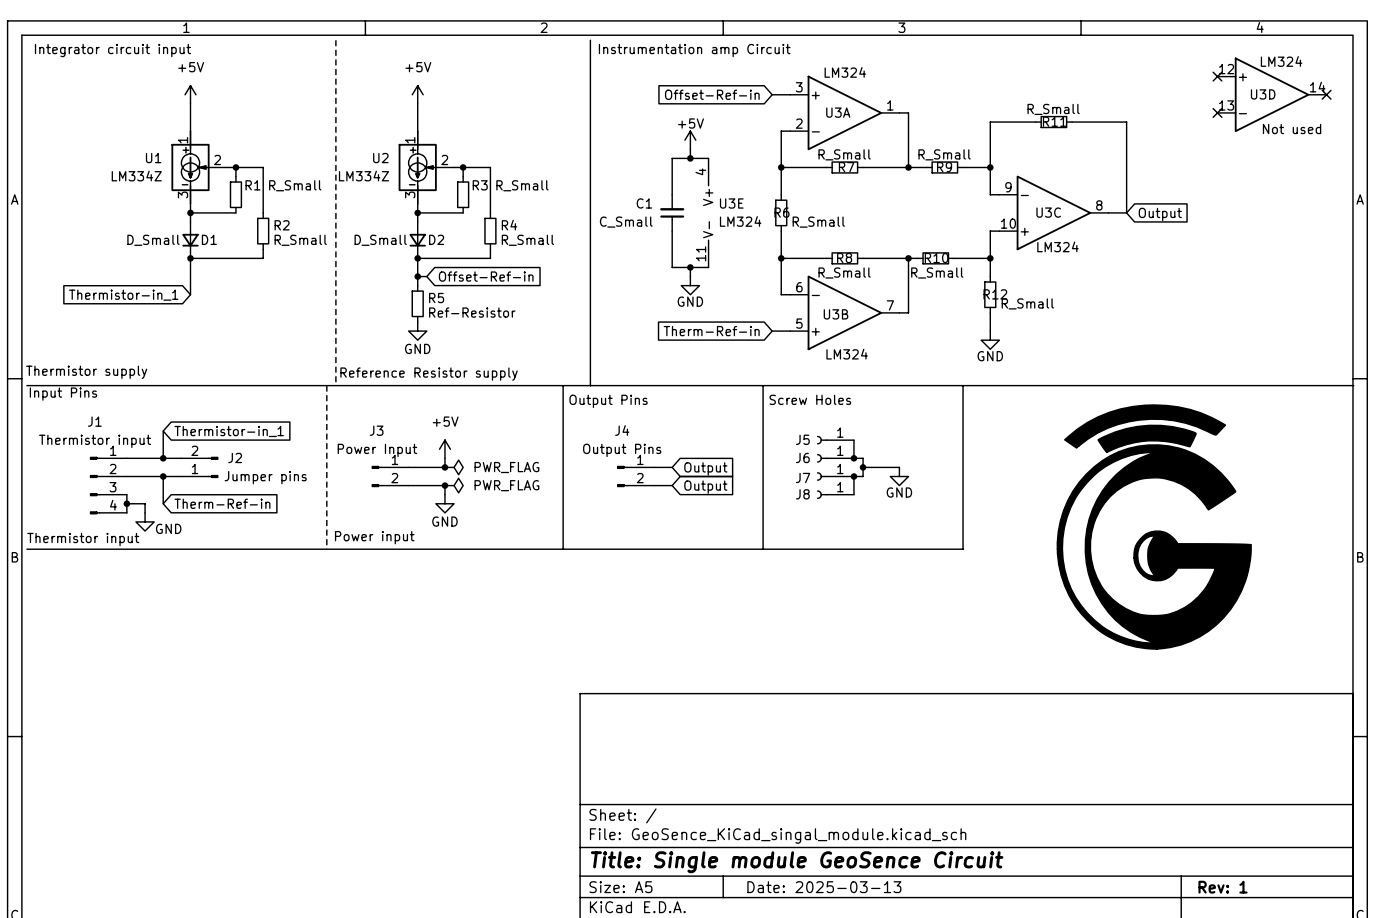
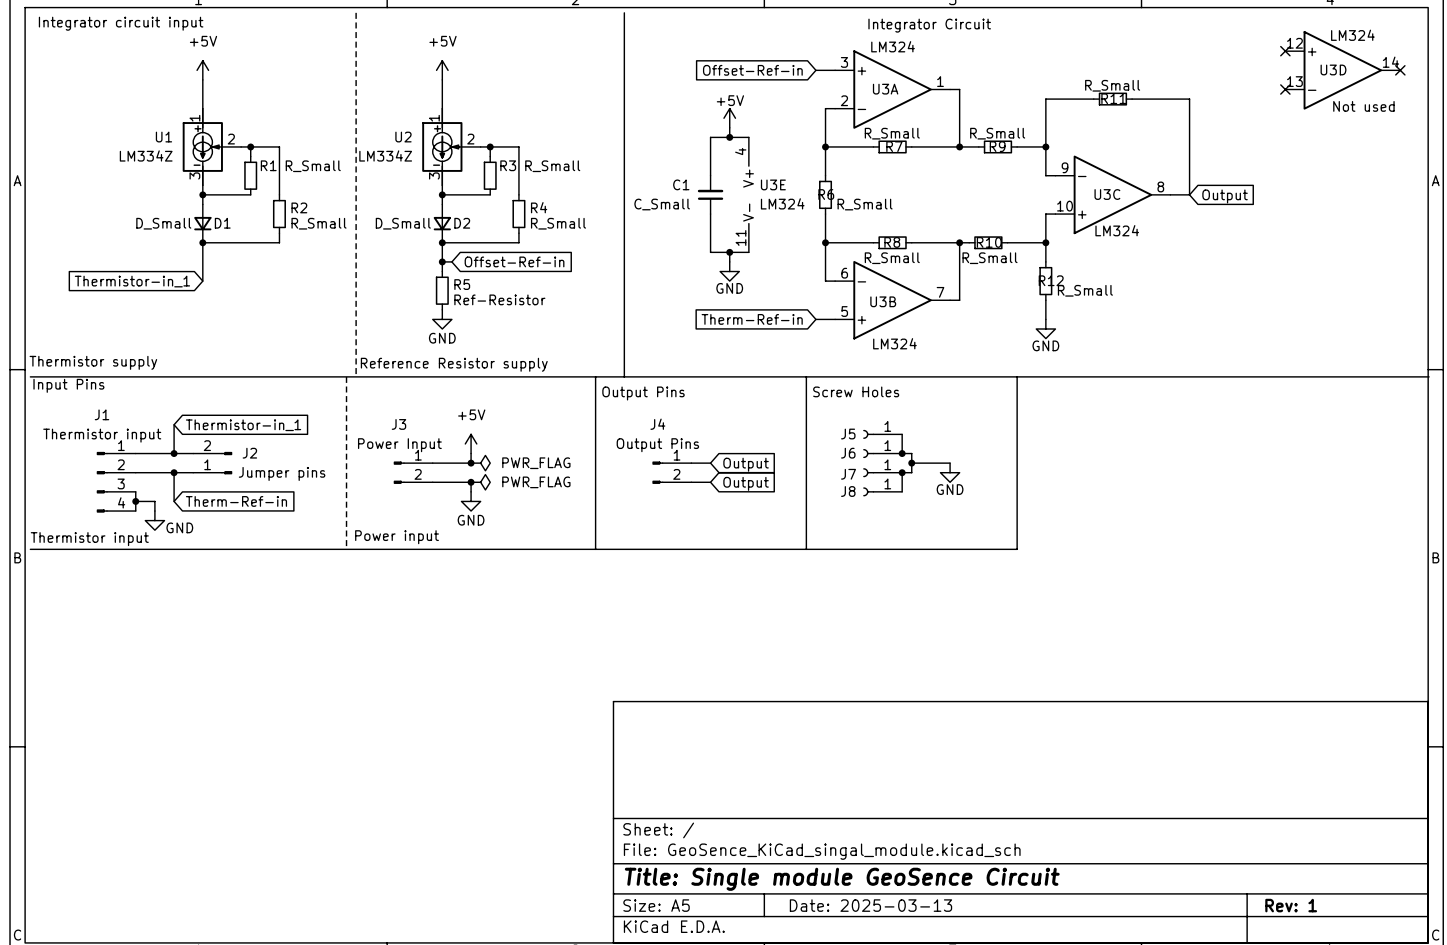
text: Instrumentation amp Circuit (694, 50) -> none
text: none -> Integrator Circuit (929, 25)
power symbol: (1154, 527) -> none

